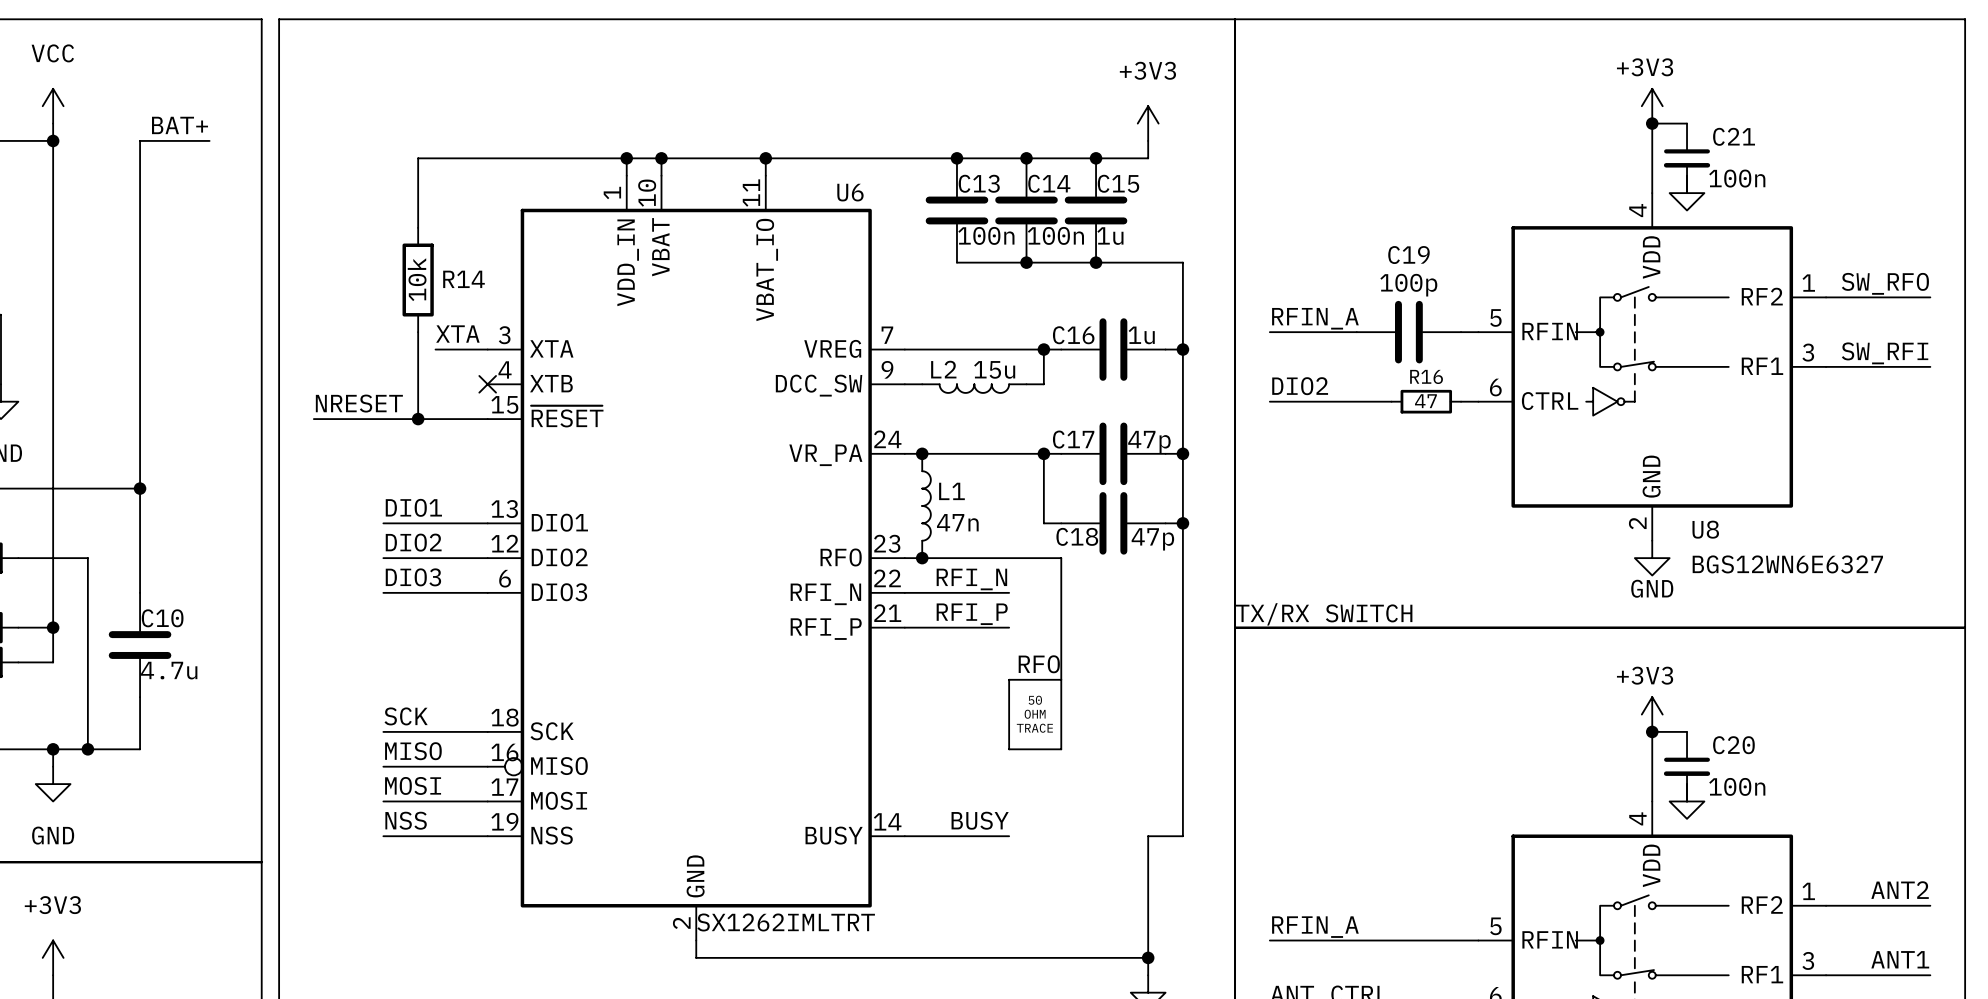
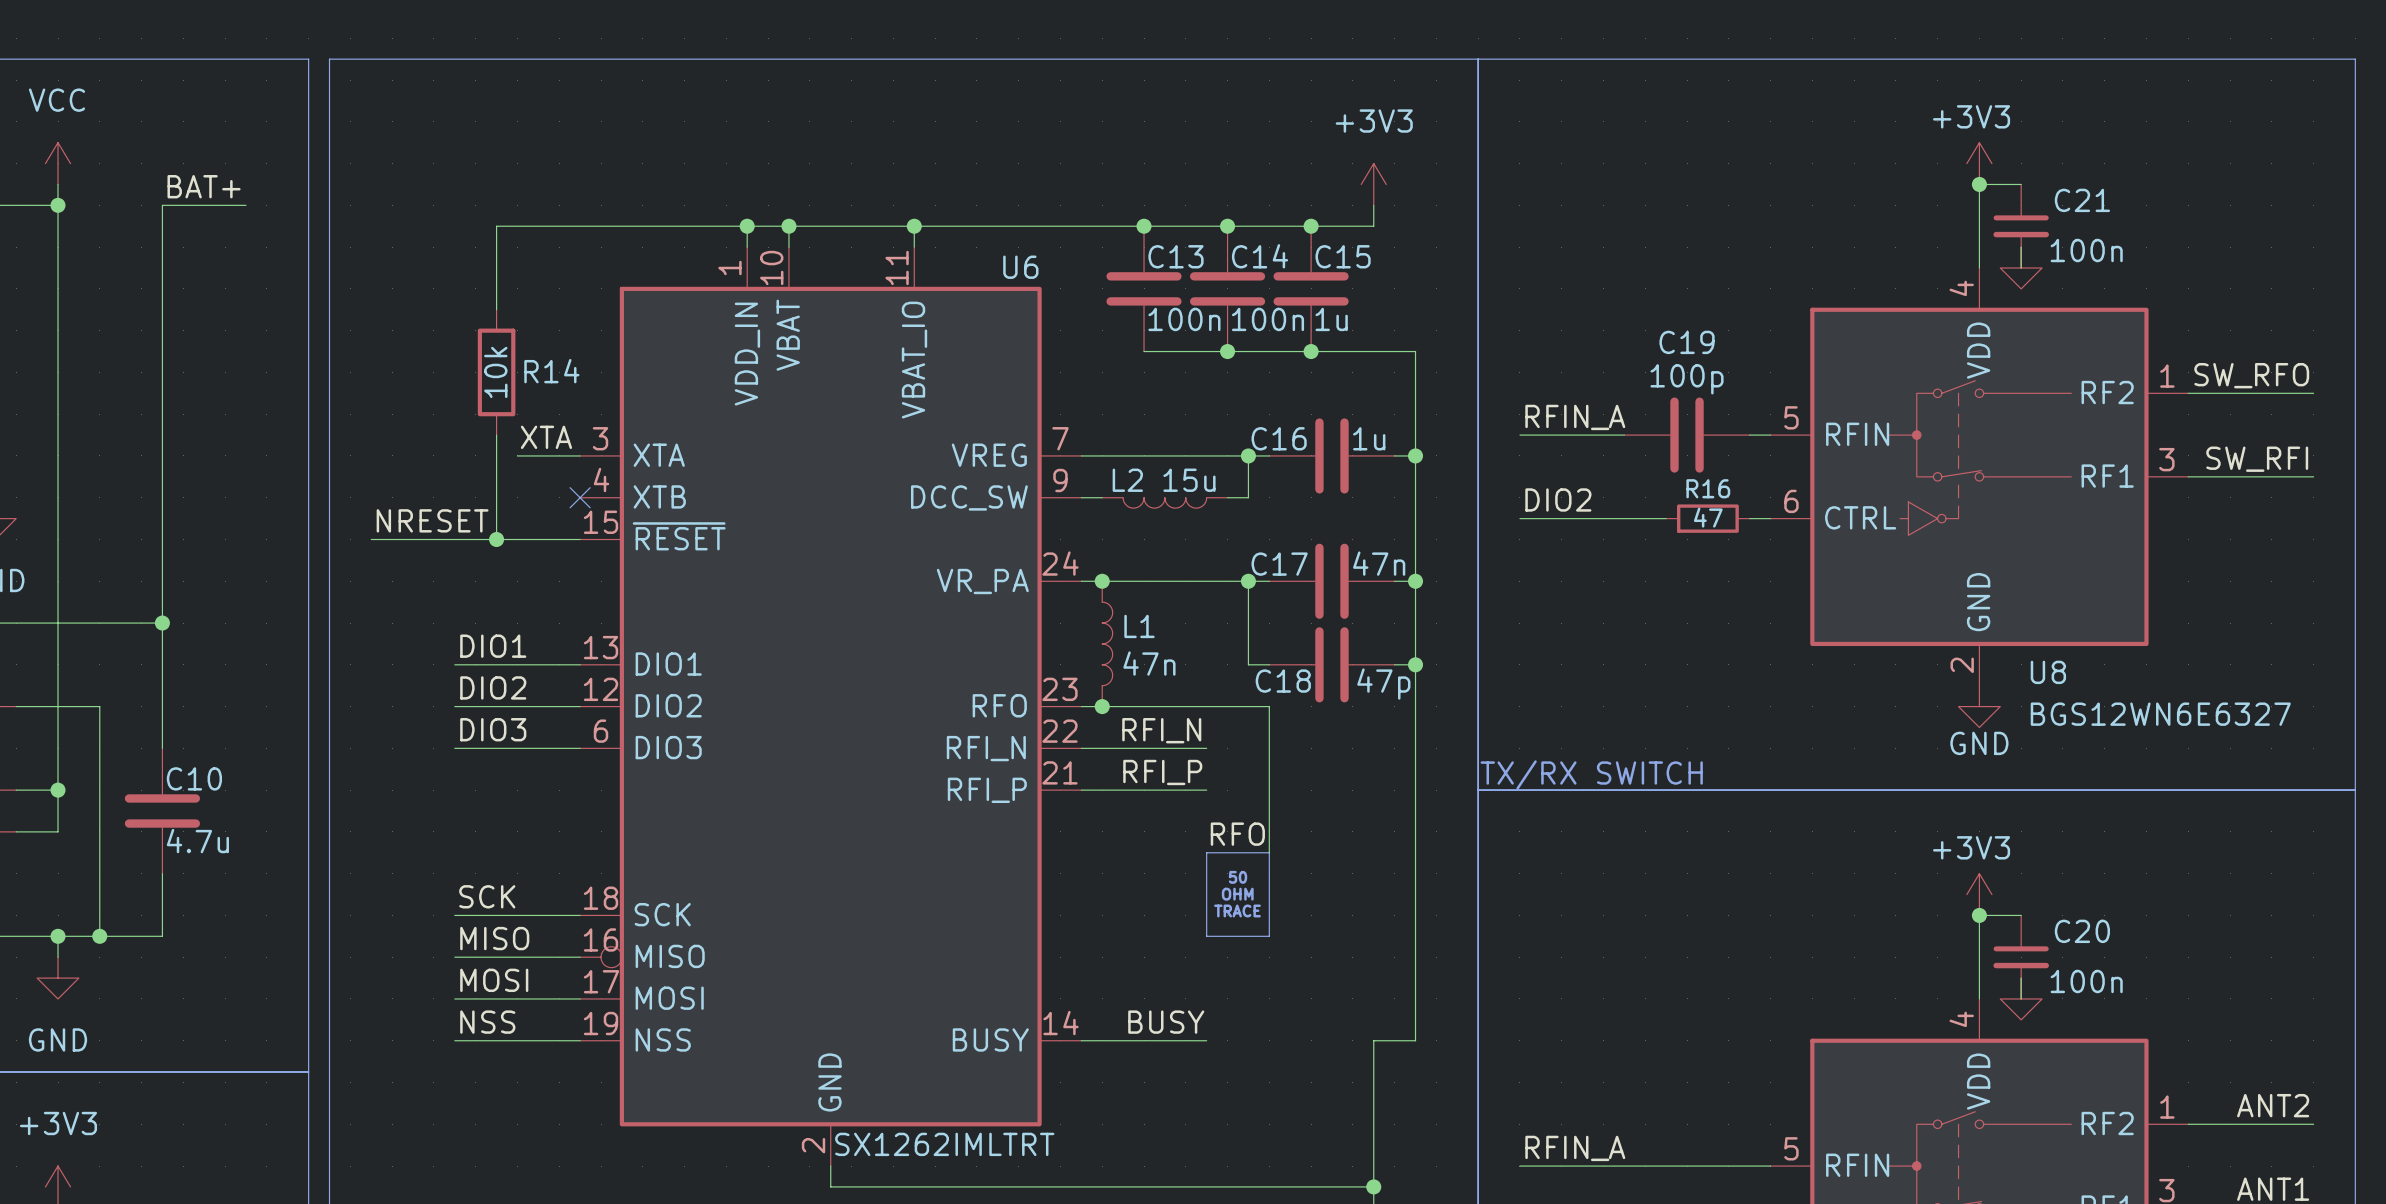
C17 value: 47p (1149, 442) -> 47n (1379, 563)

